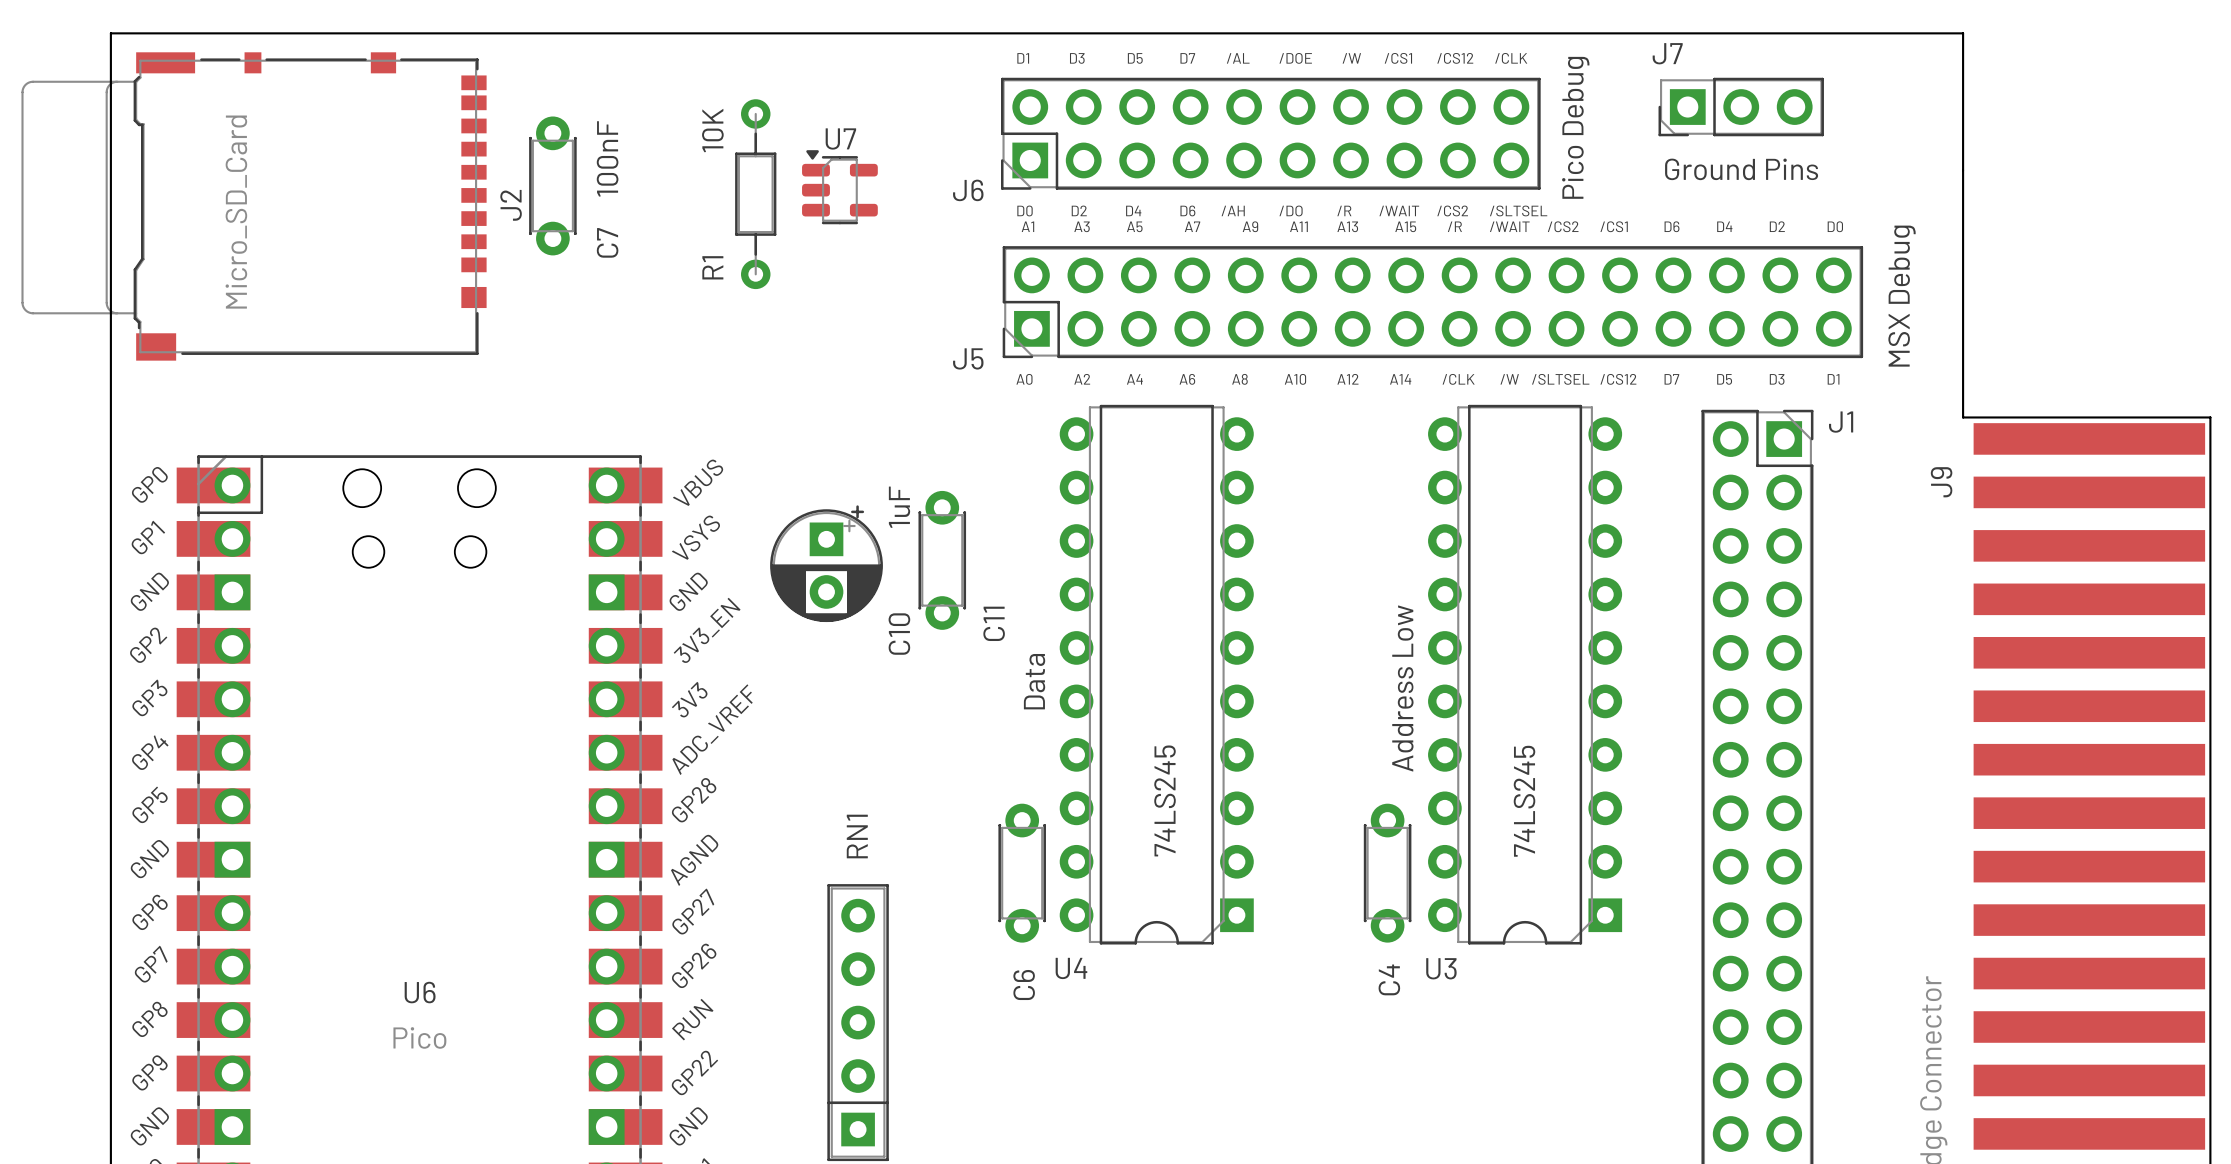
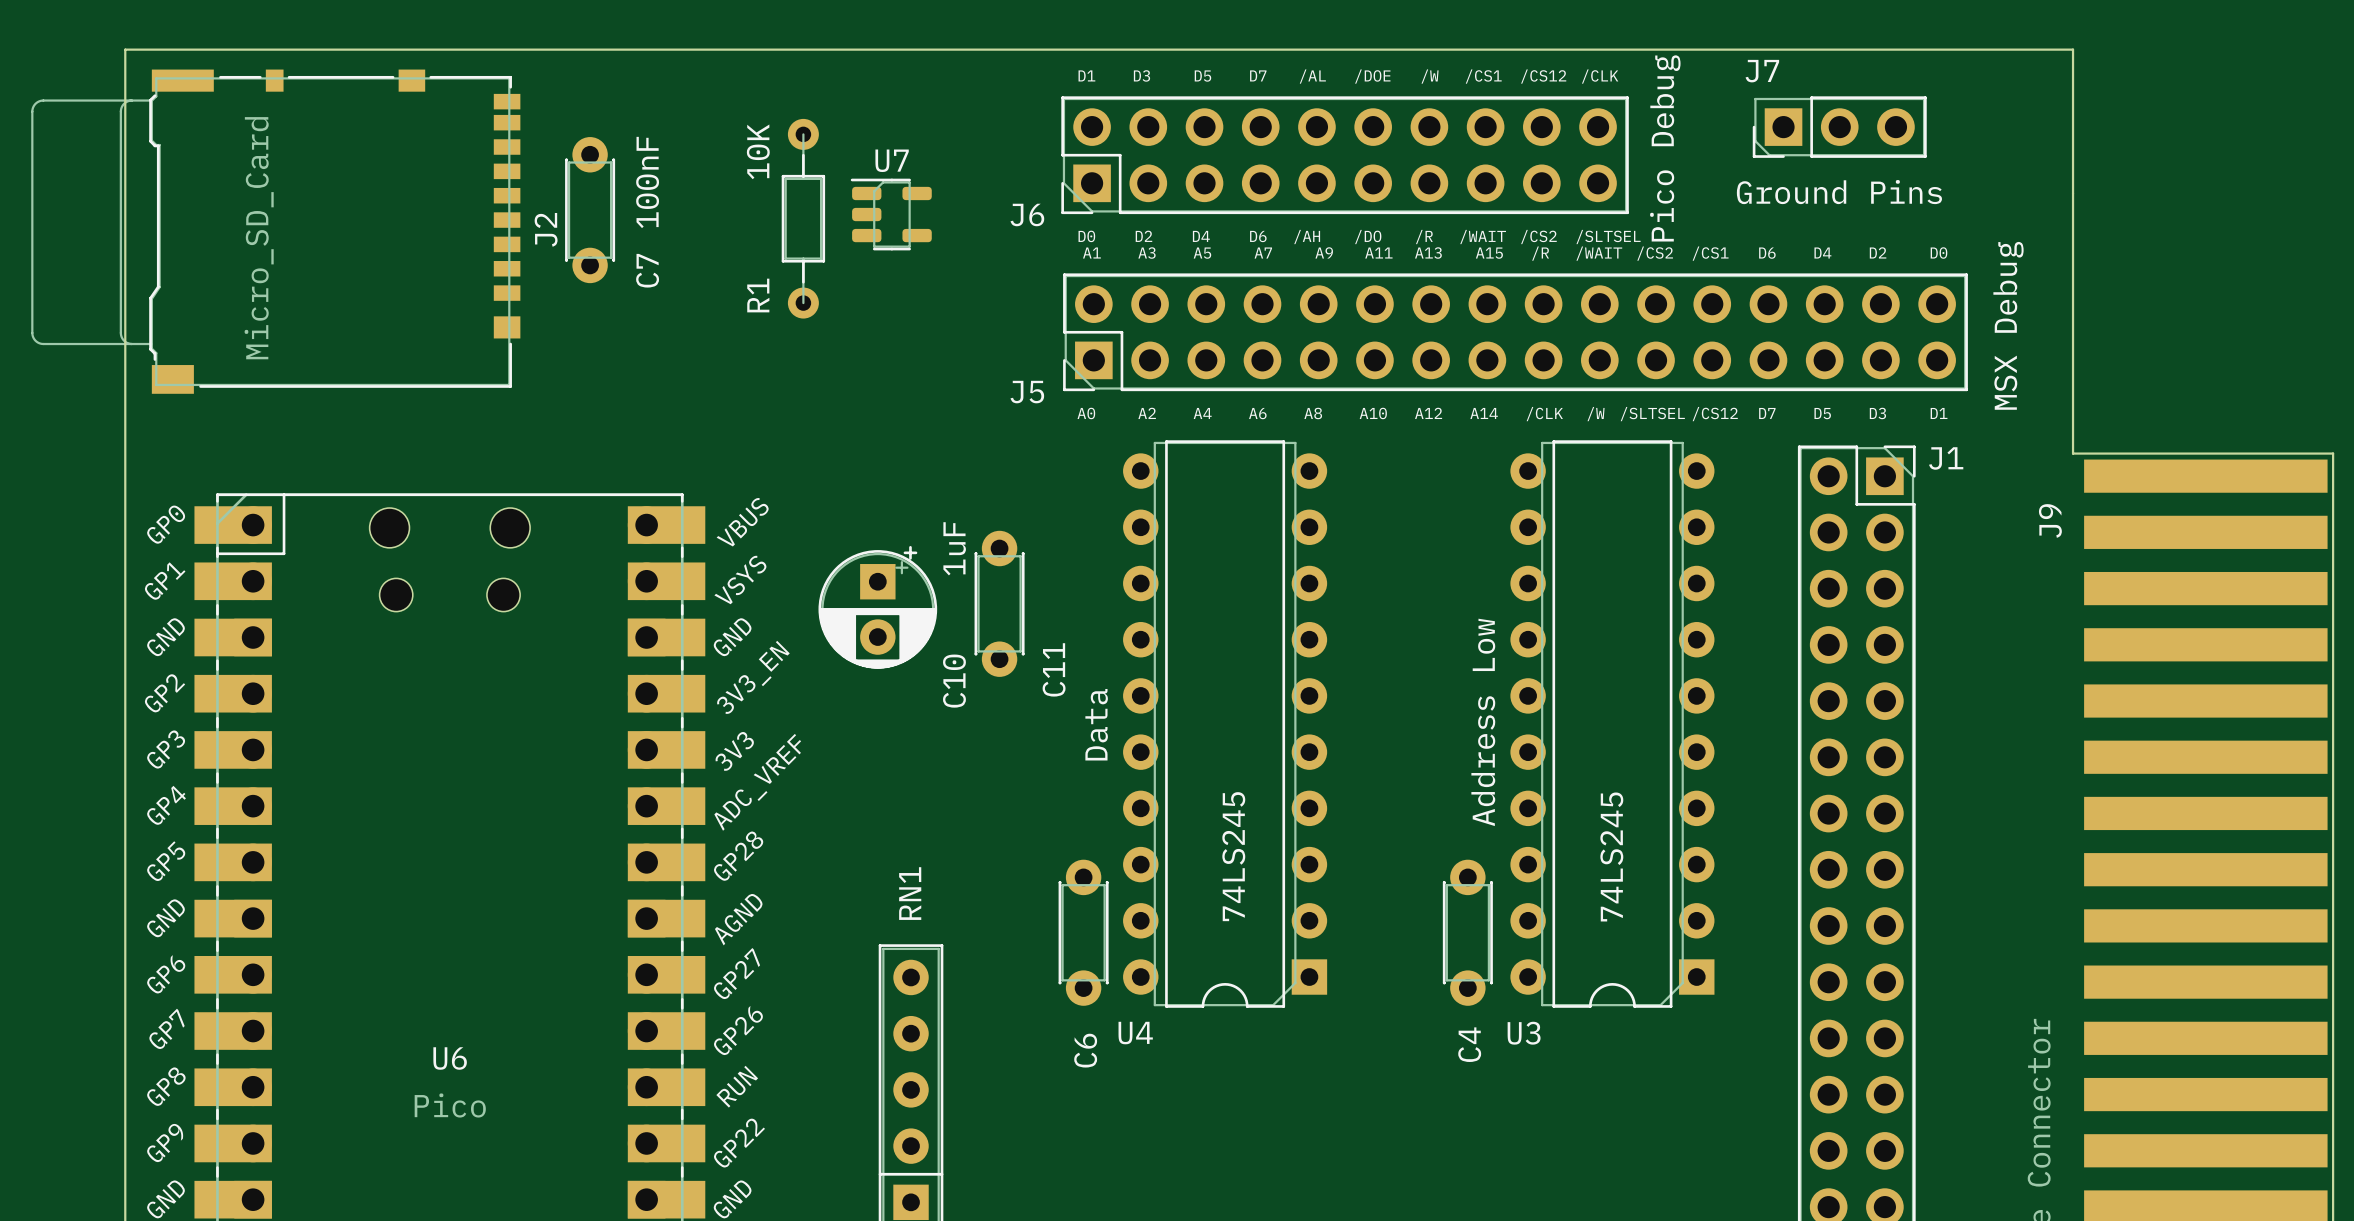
U7 footprint: [802, 150, 878, 225] -> [850, 178, 932, 251]

